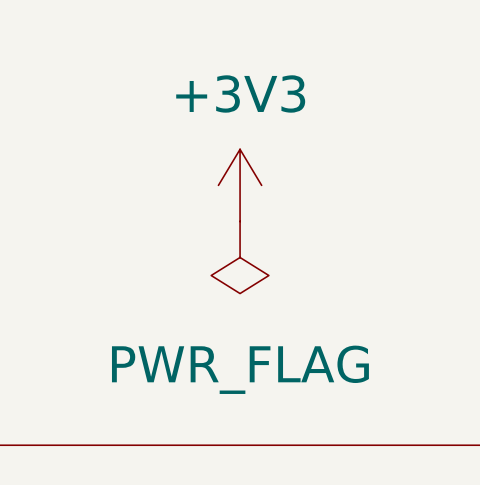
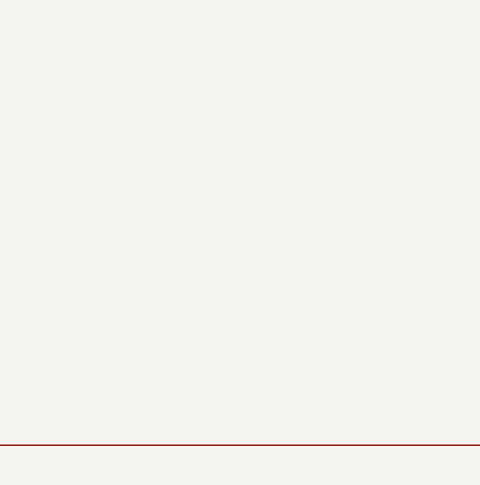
power symbol: +3V3 (240, 185) -> none
power symbol: PWR_FLAG (240, 257) -> none

